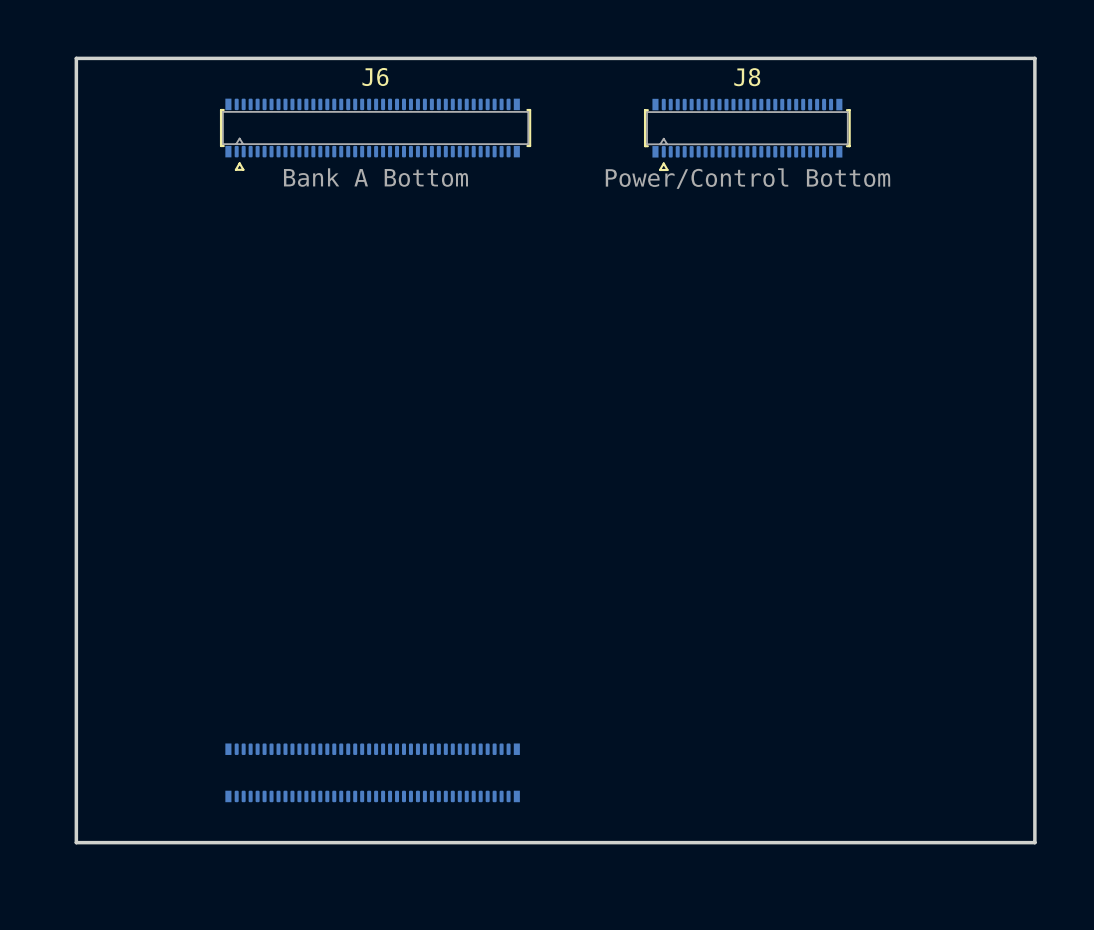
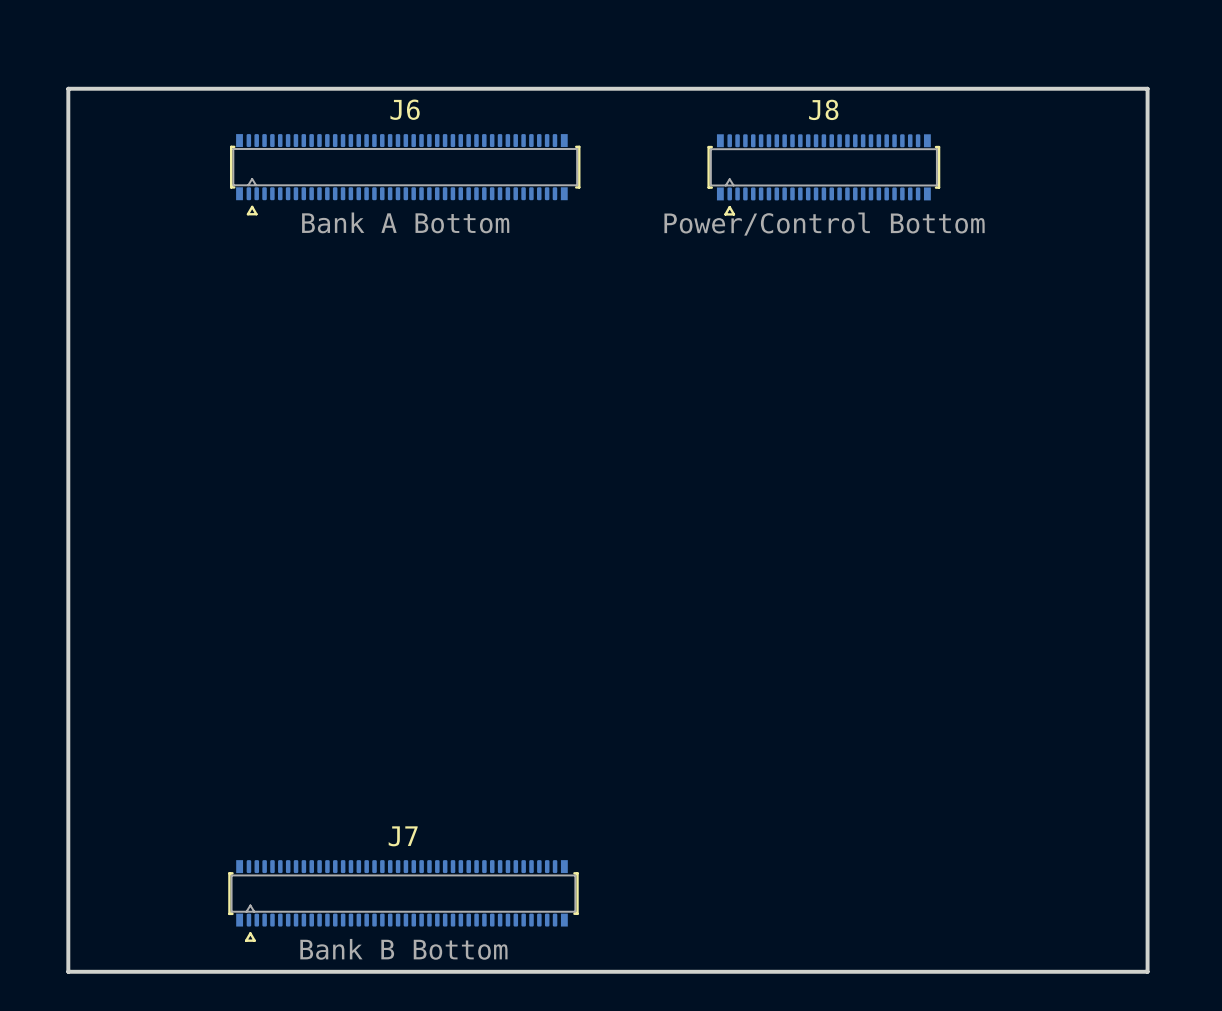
part: (372, 772) -> none
J7: none -> Bank B Bottom (403, 900)

